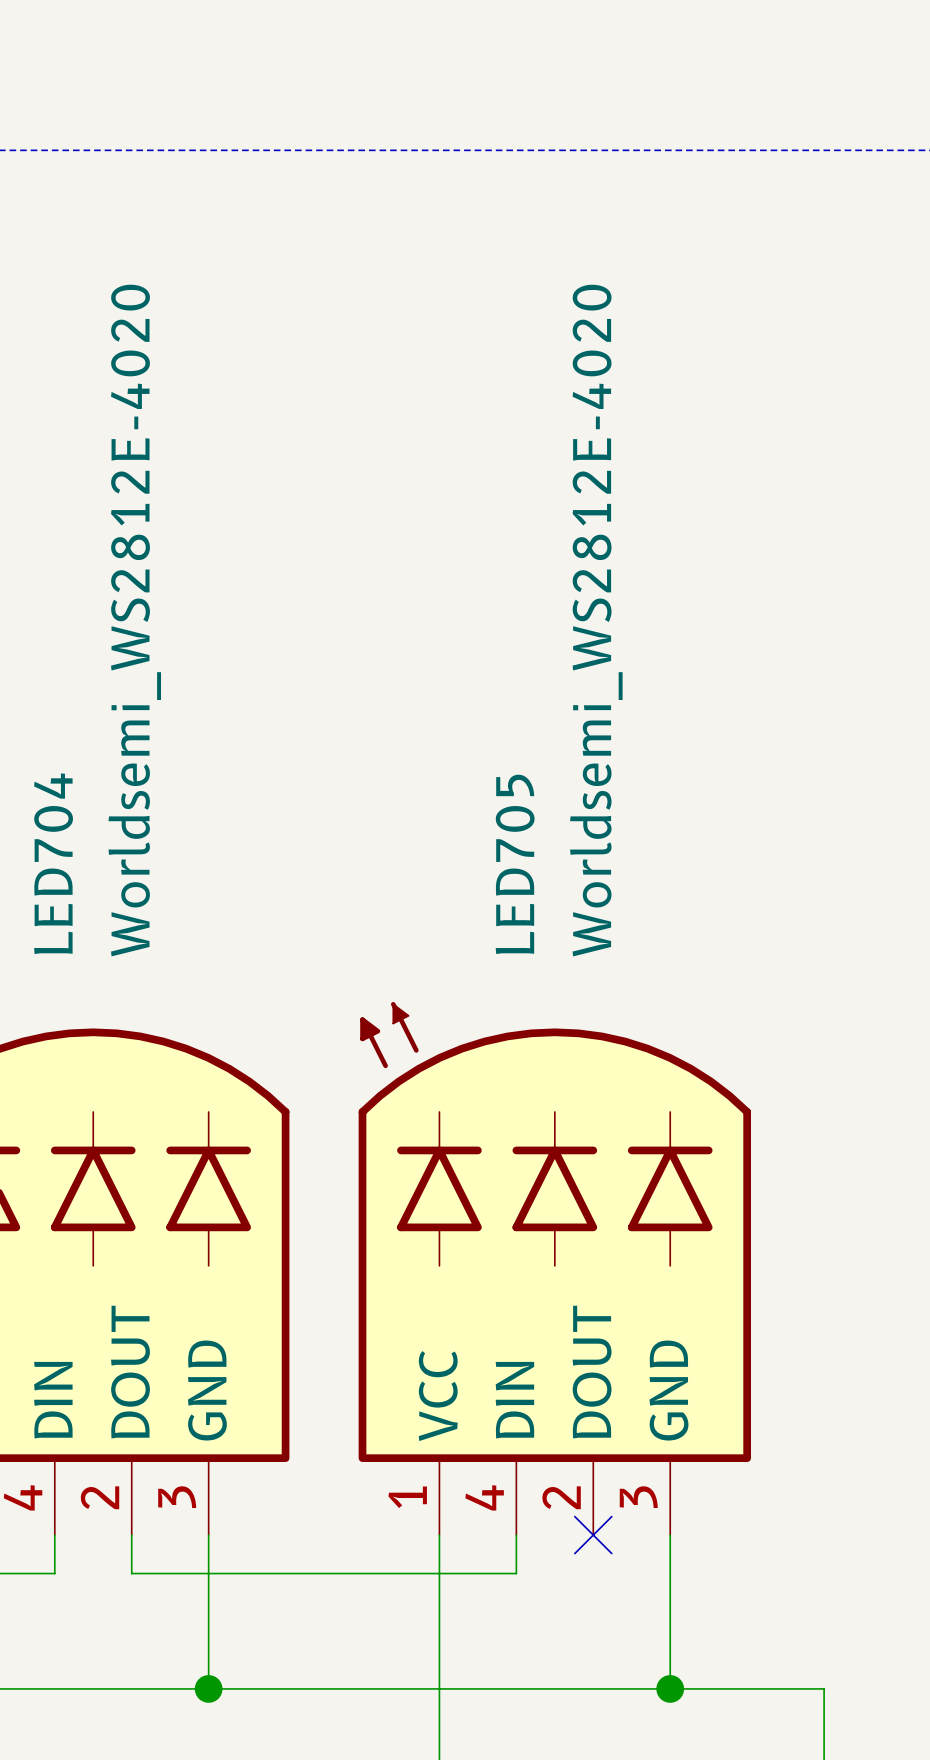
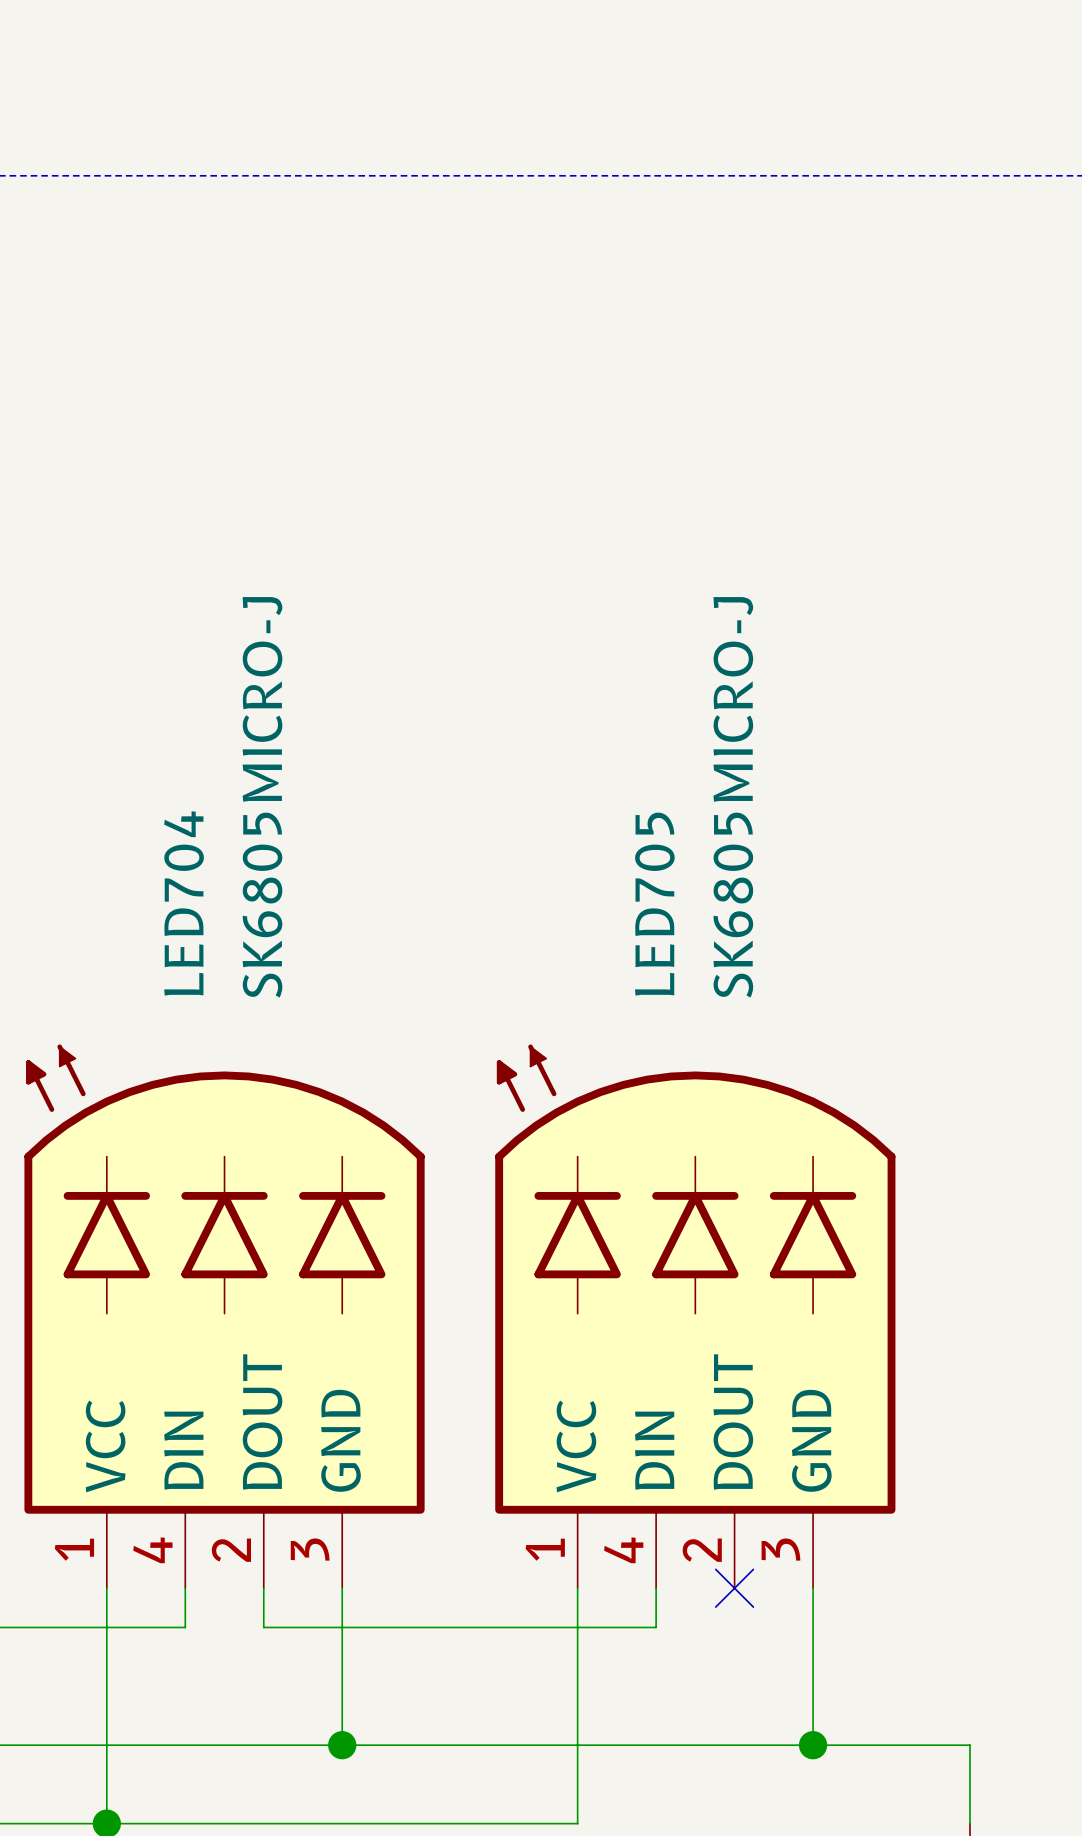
LED704 value: Worldsemi_WS2812E-4020 (134, 620) -> SK6805MICRO-J (262, 797)
LED705 value: Worldsemi_WS2812E-4020 (596, 620) -> SK6805MICRO-J (733, 797)

